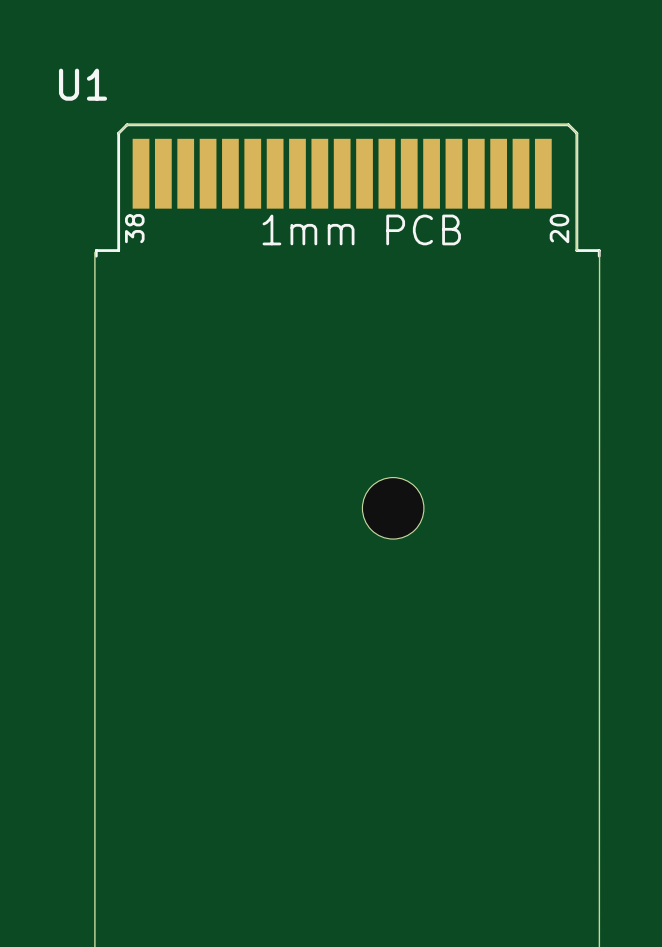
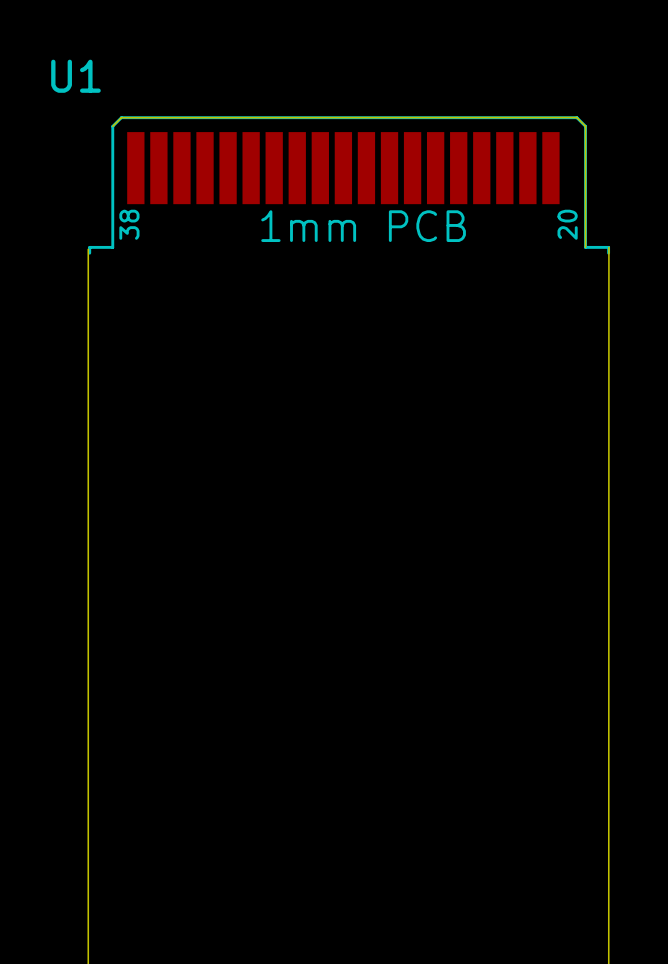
part: (393, 508) -> none

